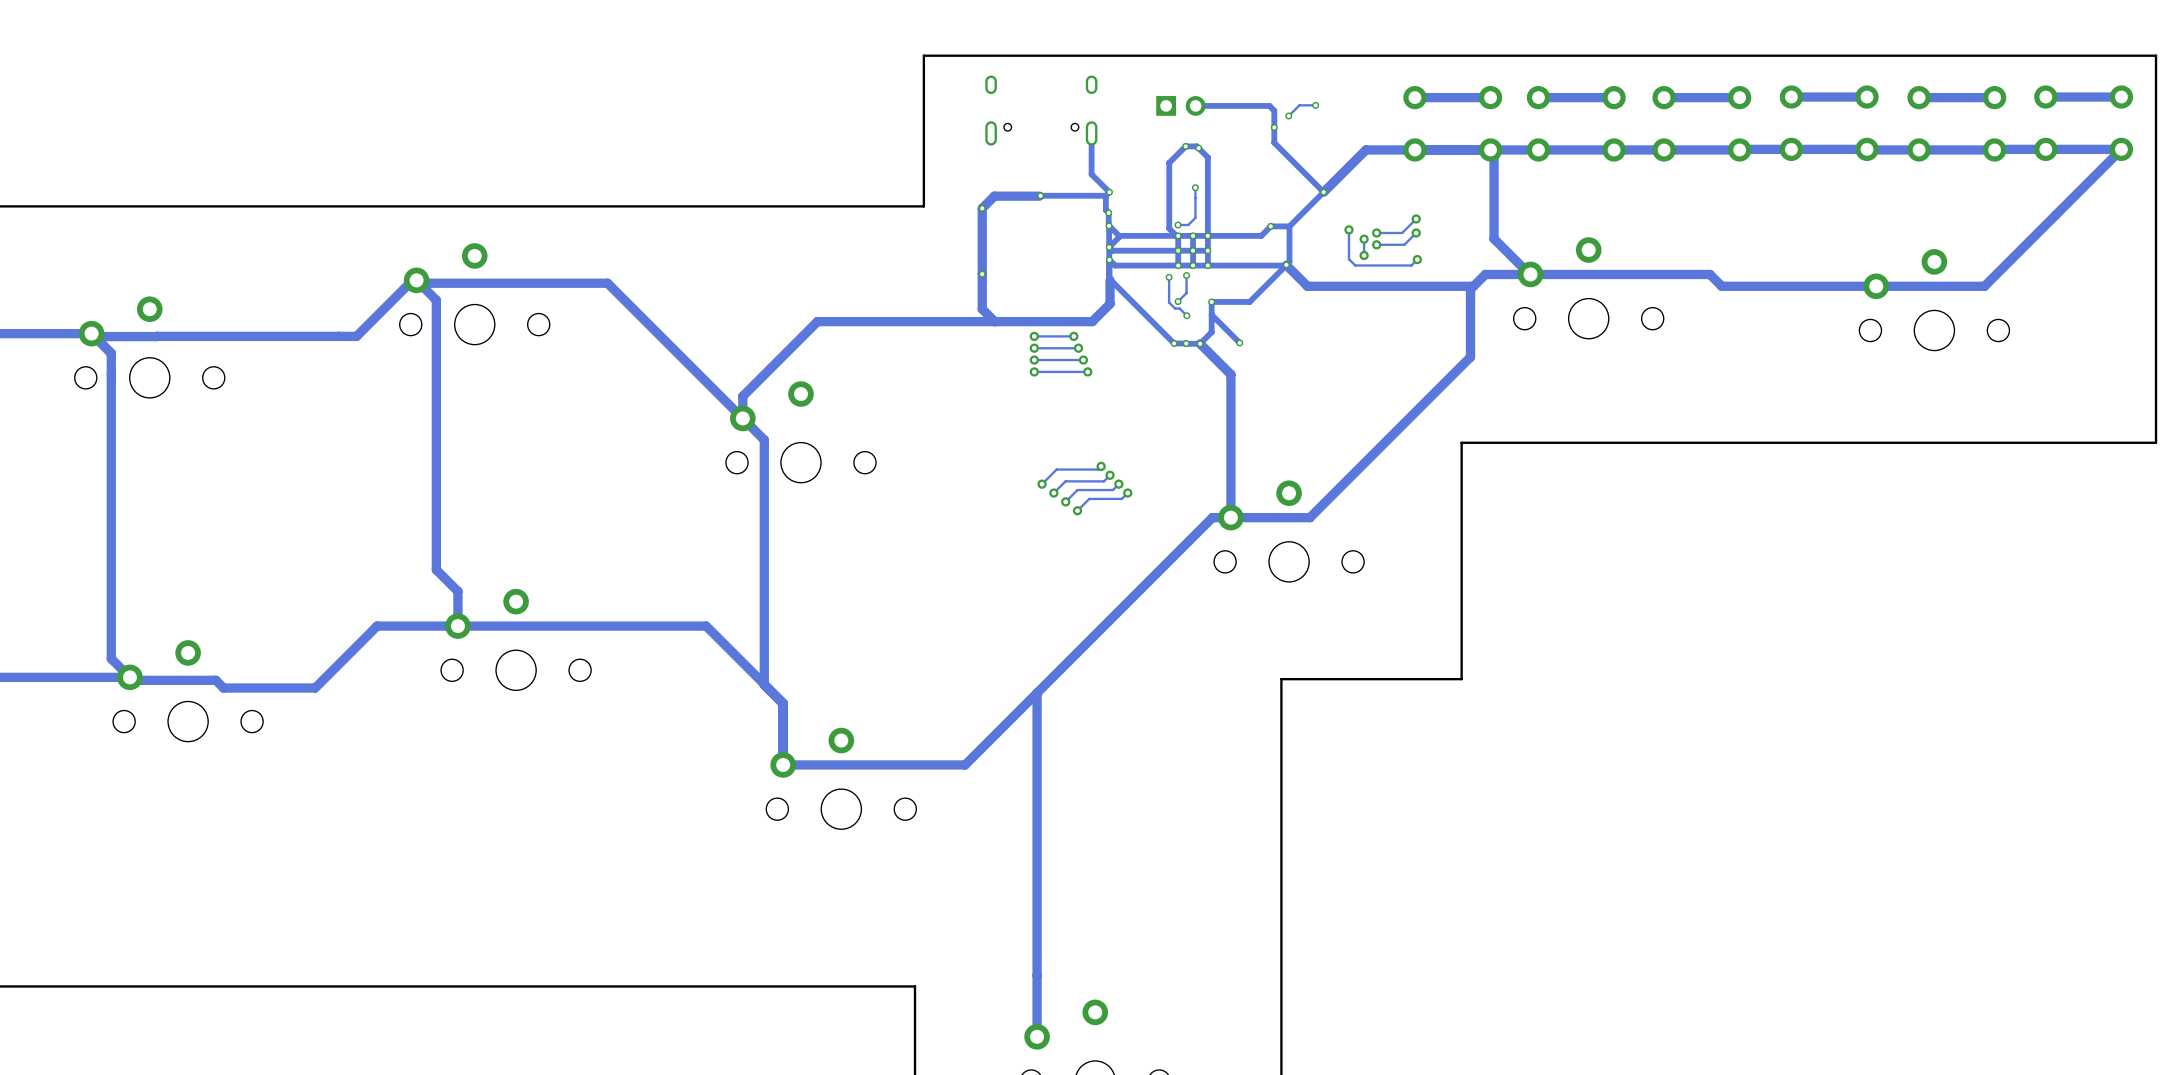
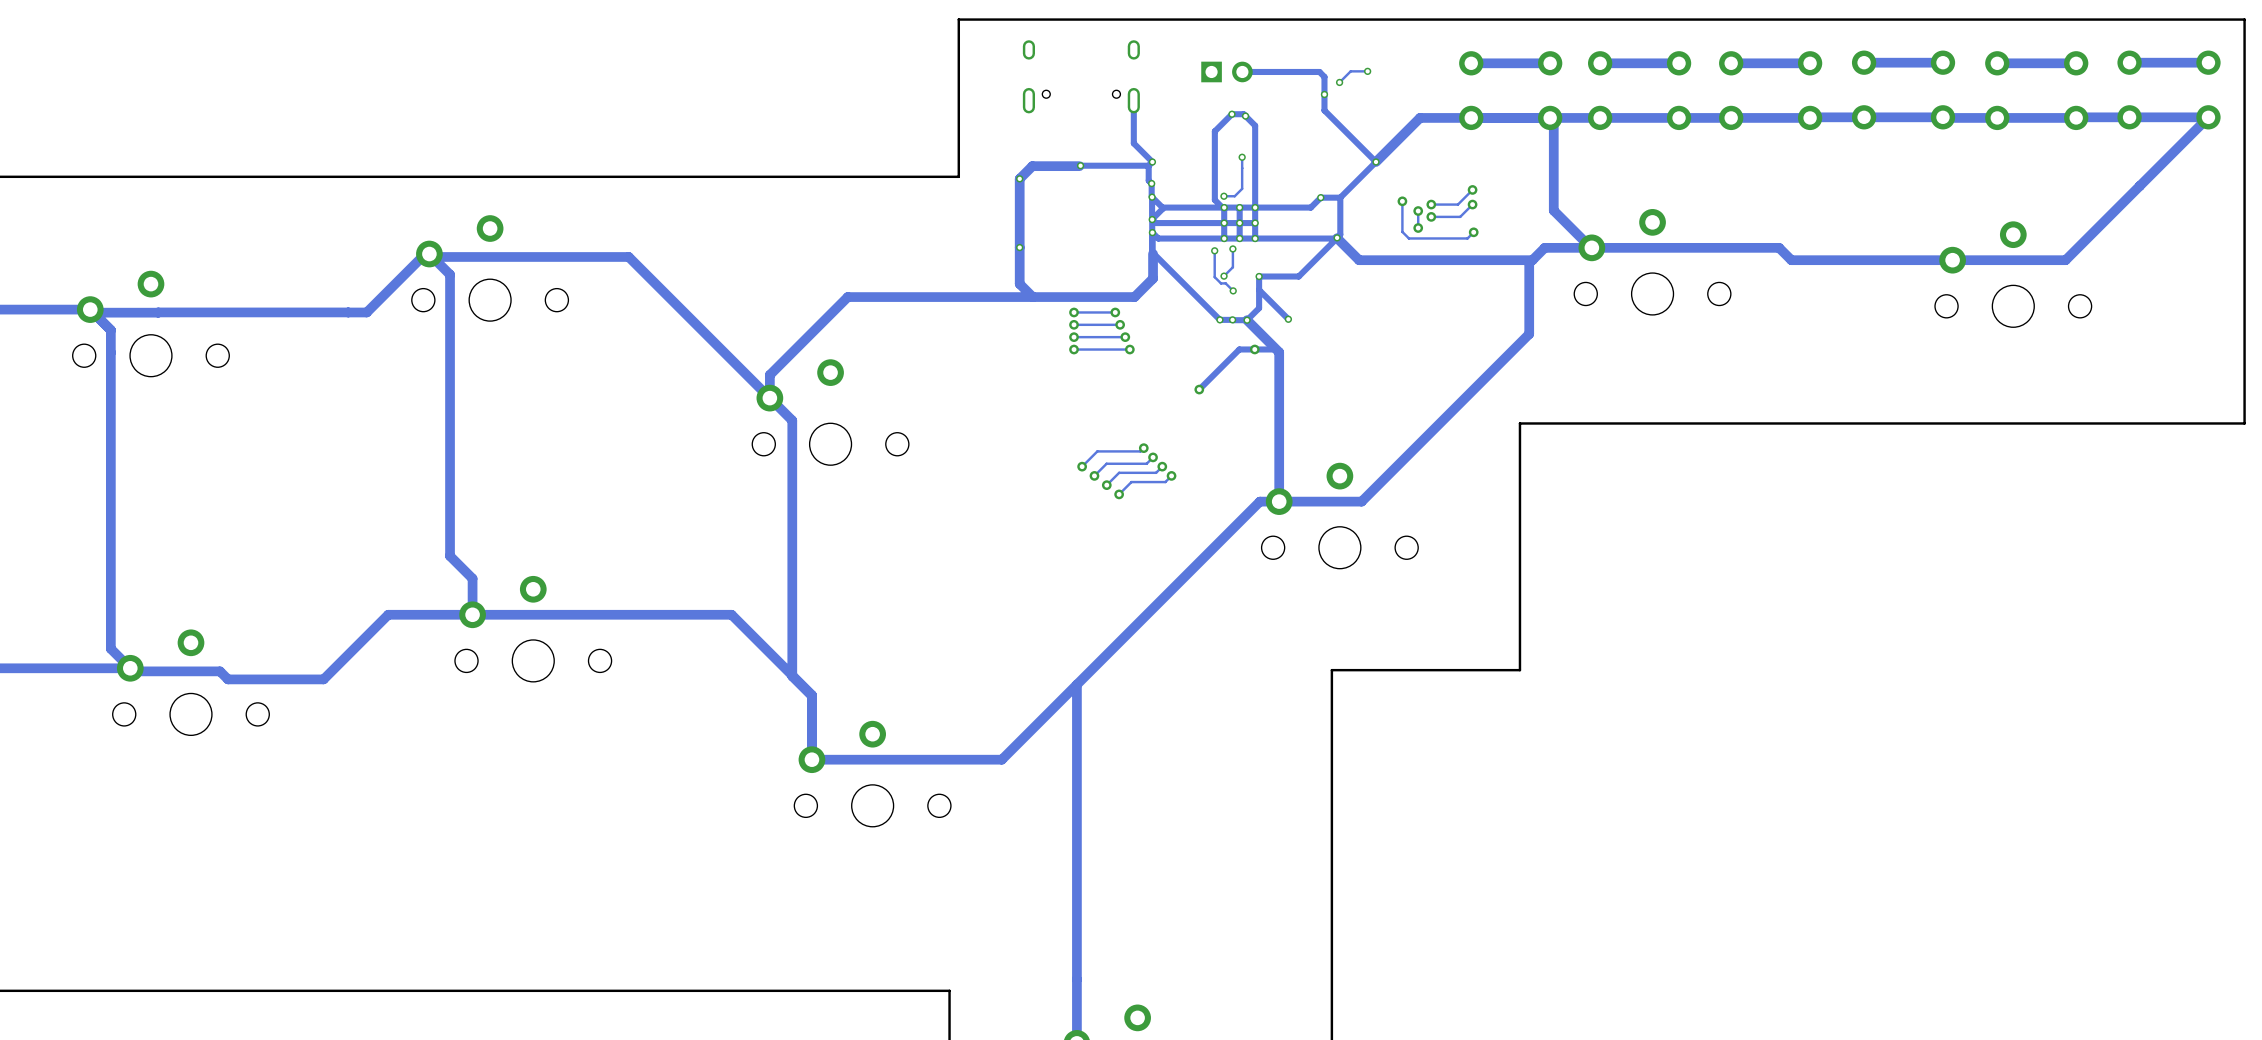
via: none -> (1254, 349)
track: none -> (1279, 352) (1276, 349) (1239, 349) (1199, 389)
via: none -> (1199, 389)

